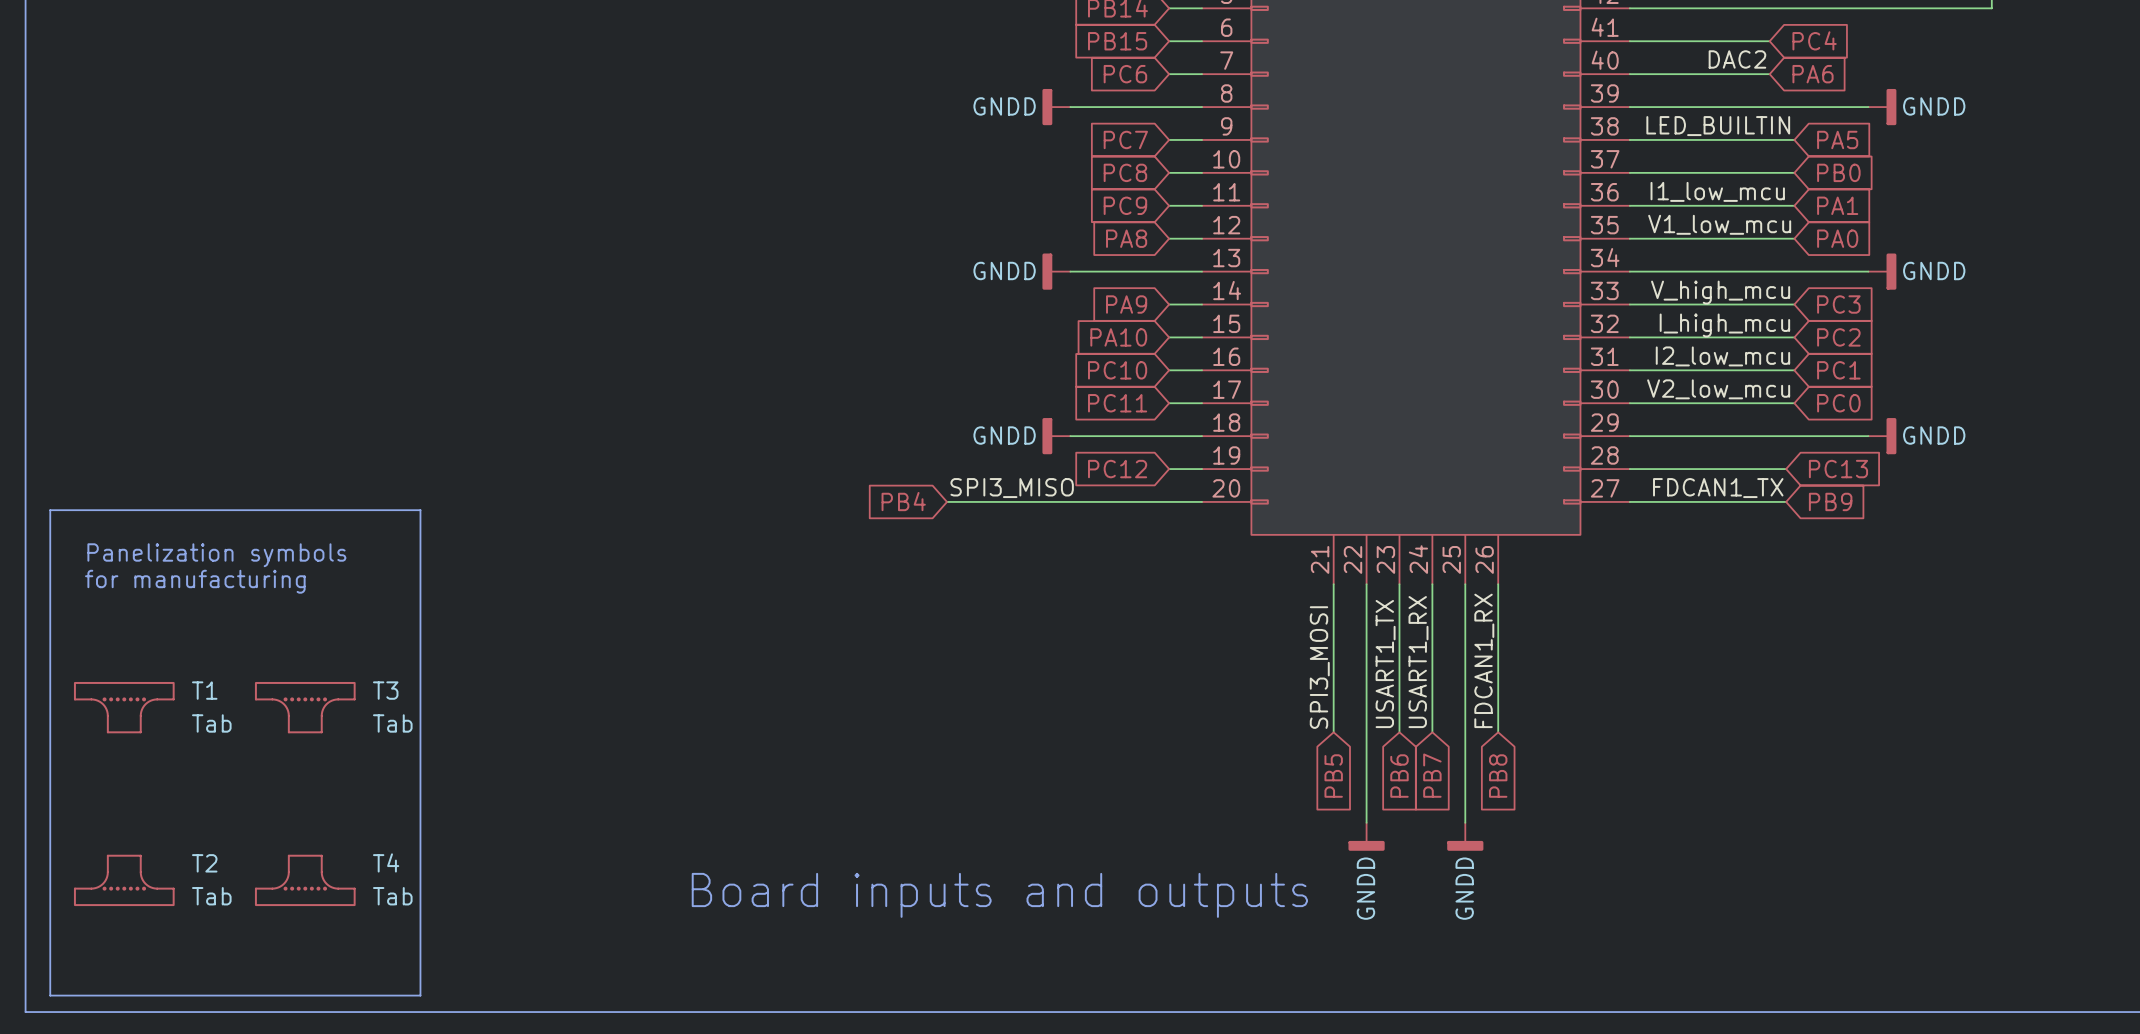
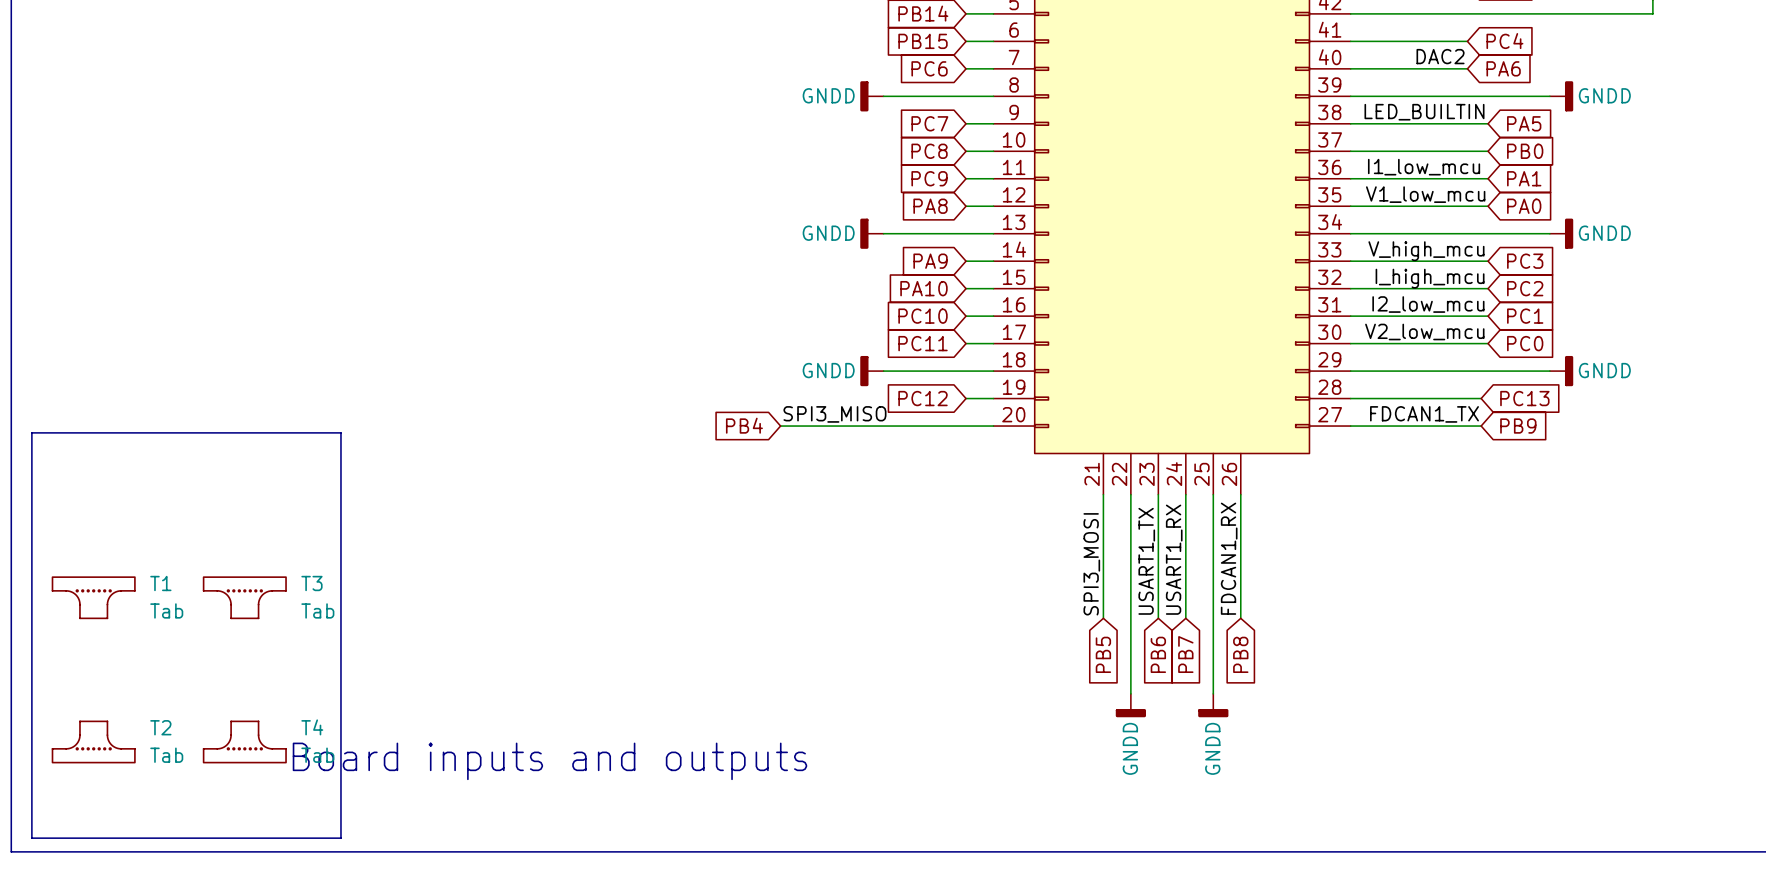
text: Panelization symbols (216, 555) -> none
text: for manufacturing (195, 581) -> none
text: Board inputs and outputs (999, 895) -> none
text: none -> Board inputs and outputs (549, 761)

